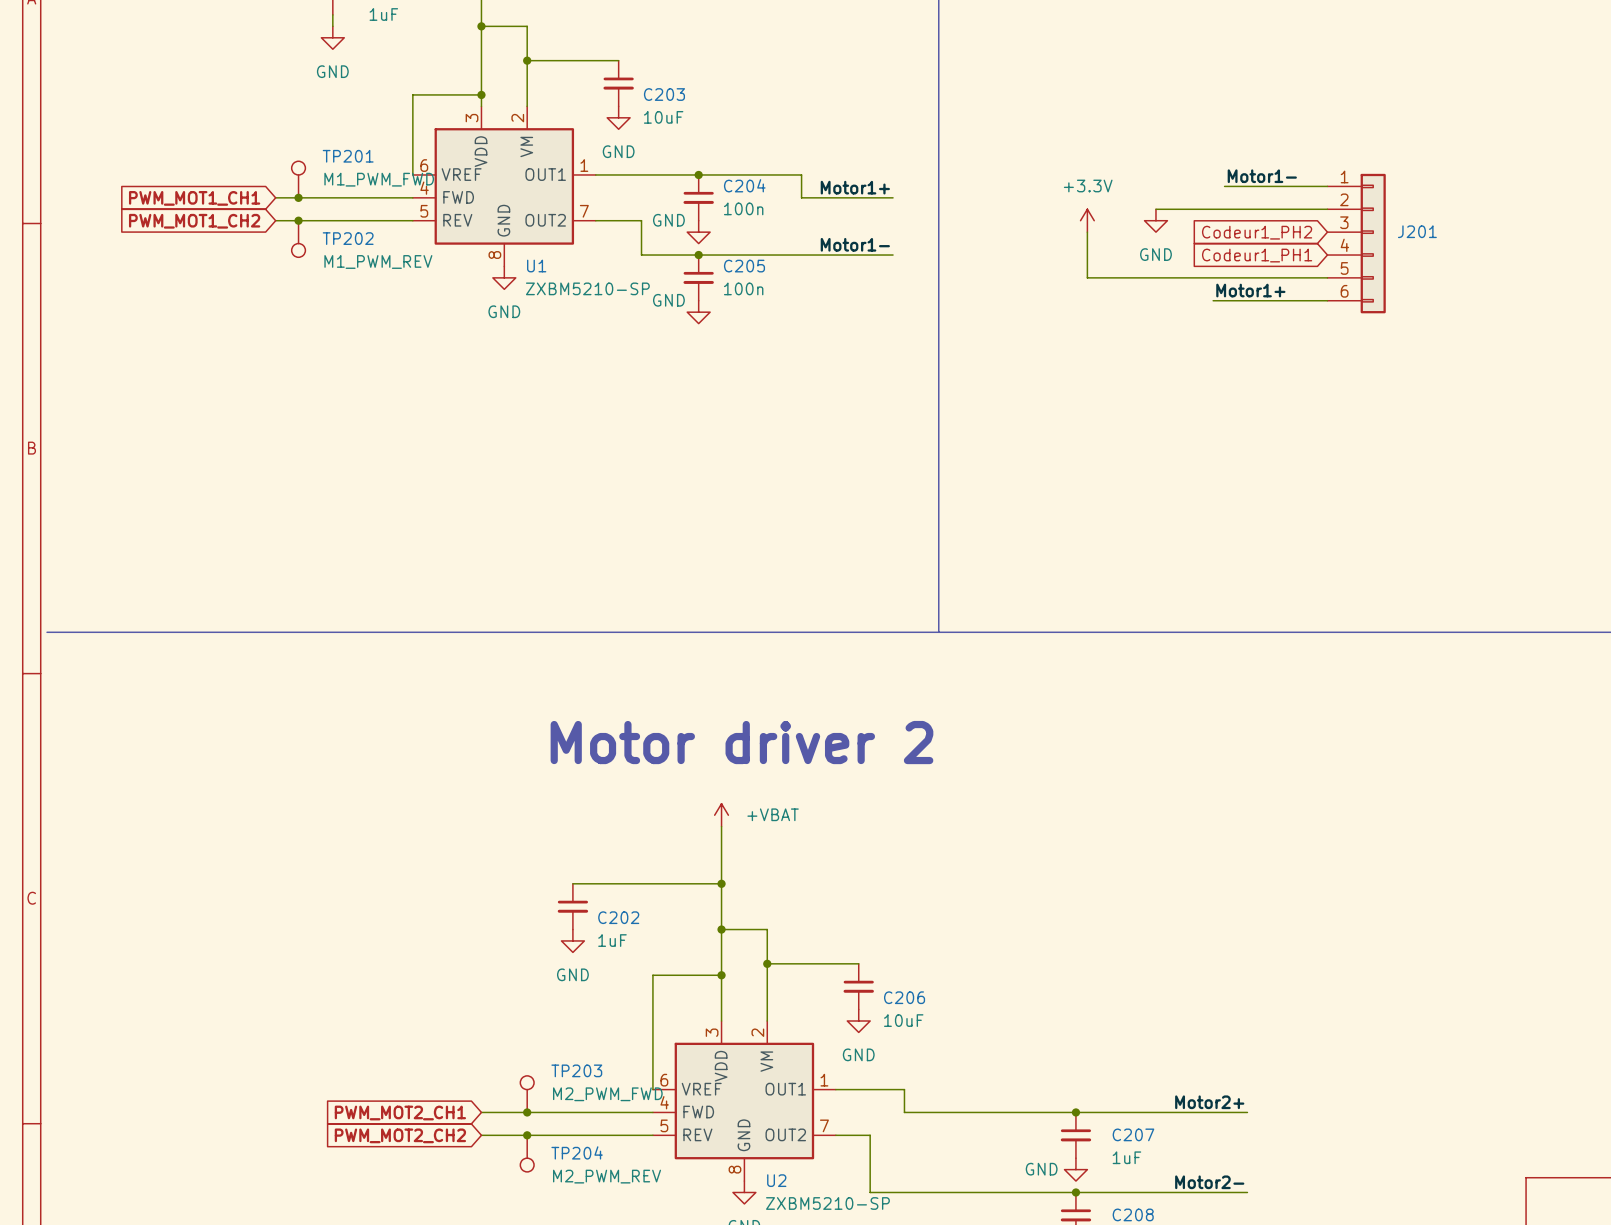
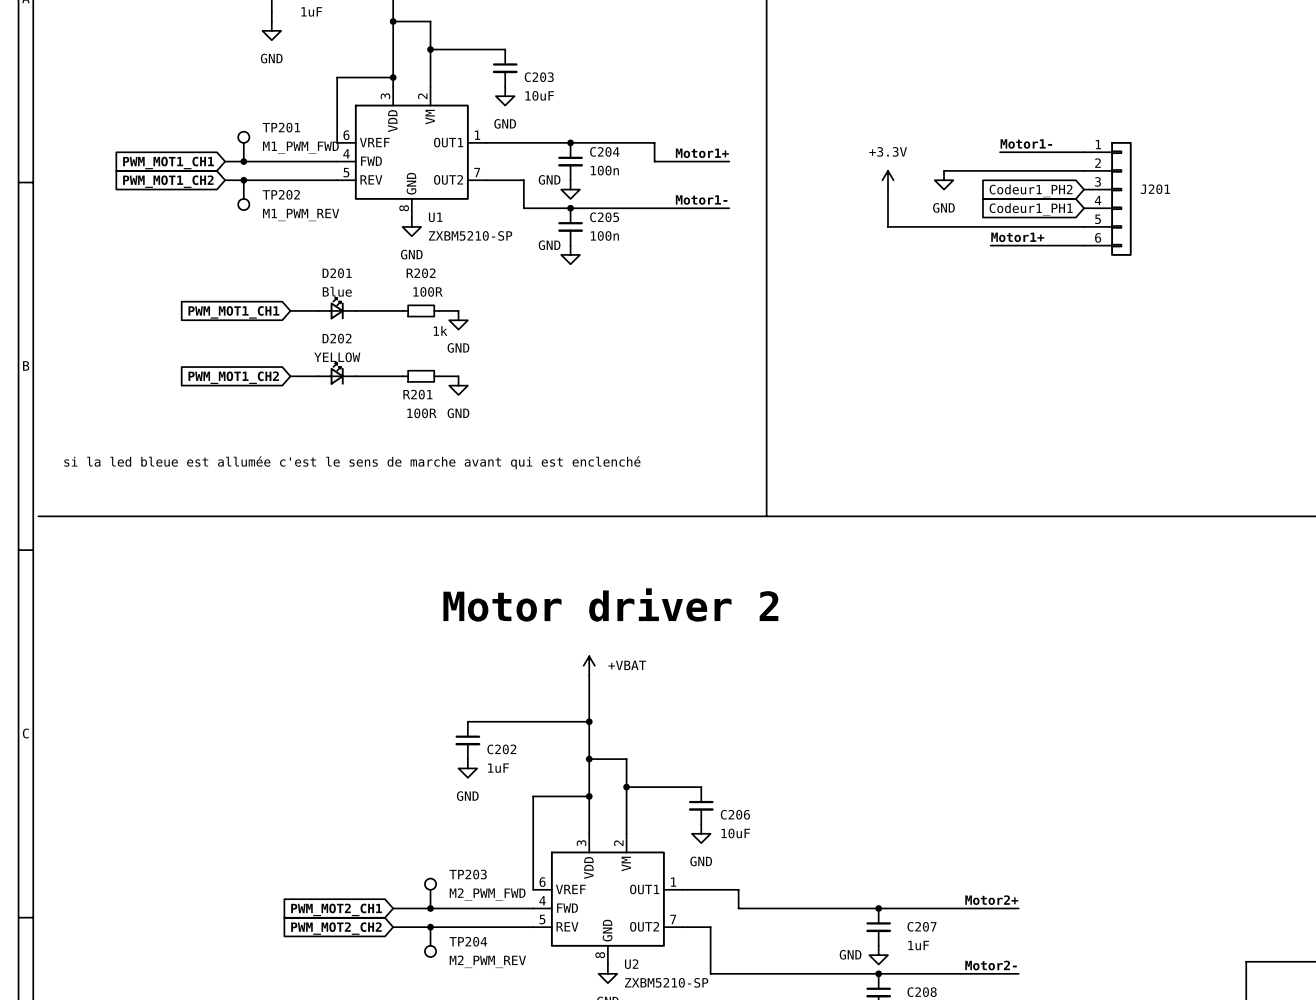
D201: none -> Blue (337, 308)
wire: none -> (290, 310) (318, 310)
wire: none -> (355, 310) (402, 310)
R201: none -> 100R (421, 310)
wire: none -> (439, 310) (458, 310)
global label: none -> PWM_MOT1_CH1 (233, 312)
power symbol: none -> GND (458, 320)
text: none -> 1k (440, 330)
D202: none -> YELLOW (337, 373)
wire: none -> (290, 376) (318, 376)
wire: none -> (355, 376) (402, 376)
R202: none -> 100R (421, 376)
wire: none -> (439, 376) (458, 376)
global label: none -> PWM_MOT1_CH2 (233, 377)
power symbol: none -> GND (458, 385)
text: none -> si la led bleue est allumée c'est le sens de marche avant qui est enclenché (352, 462)

